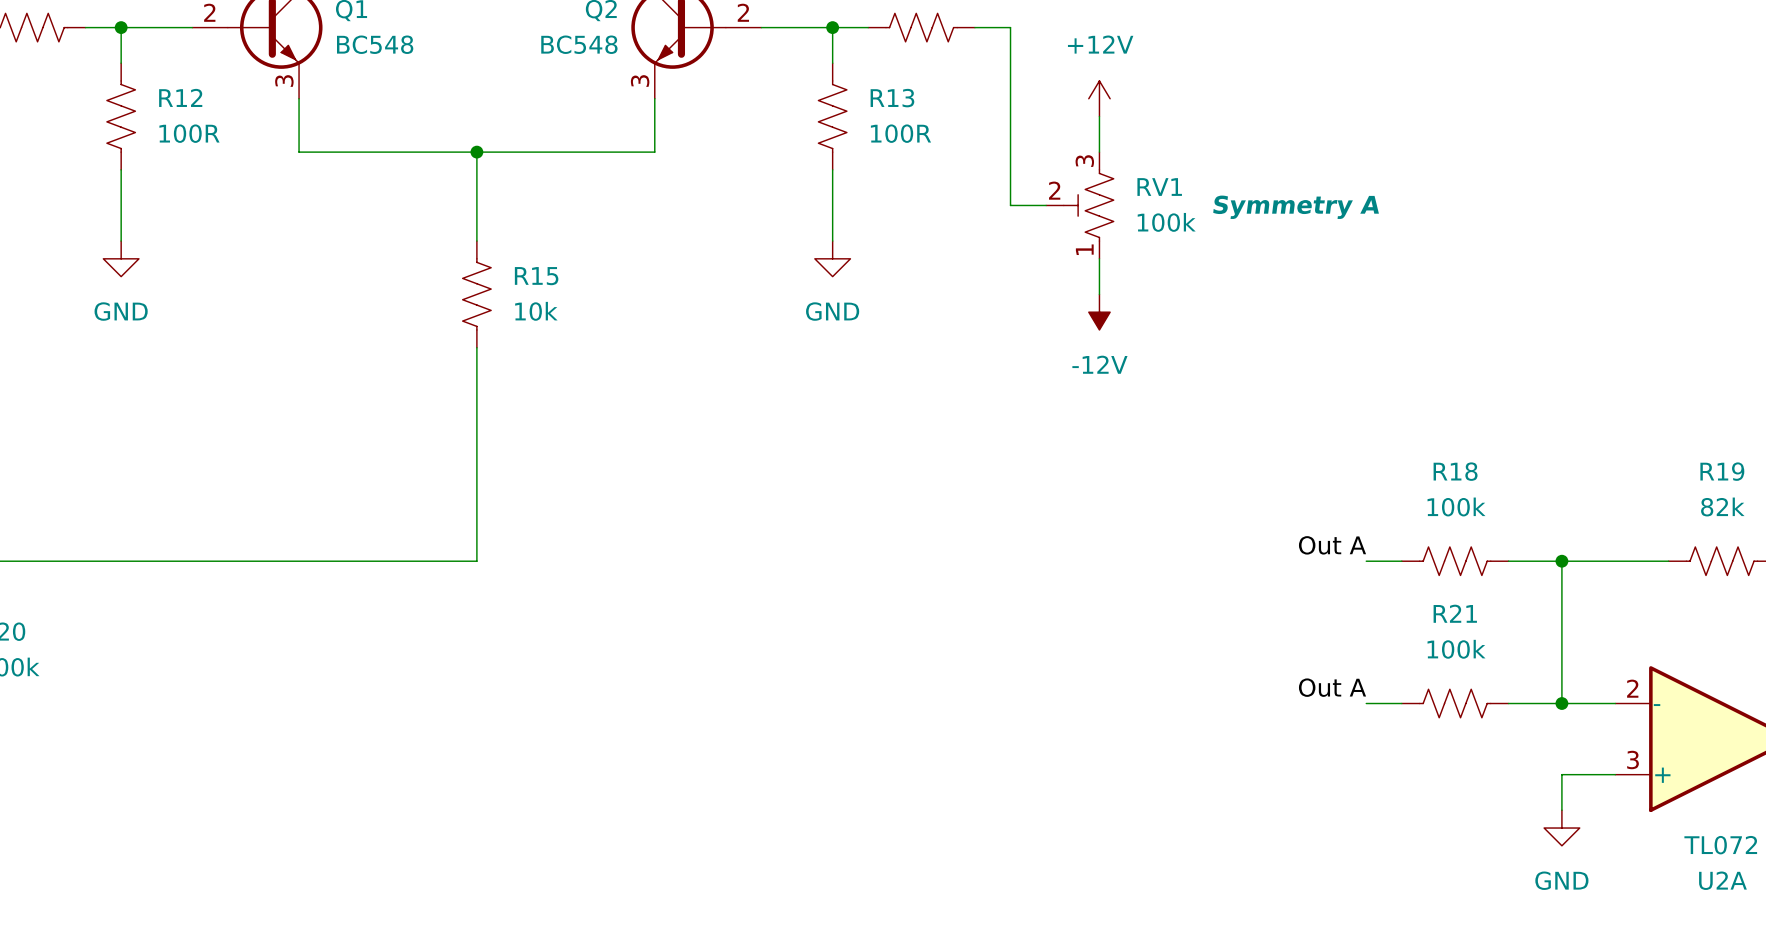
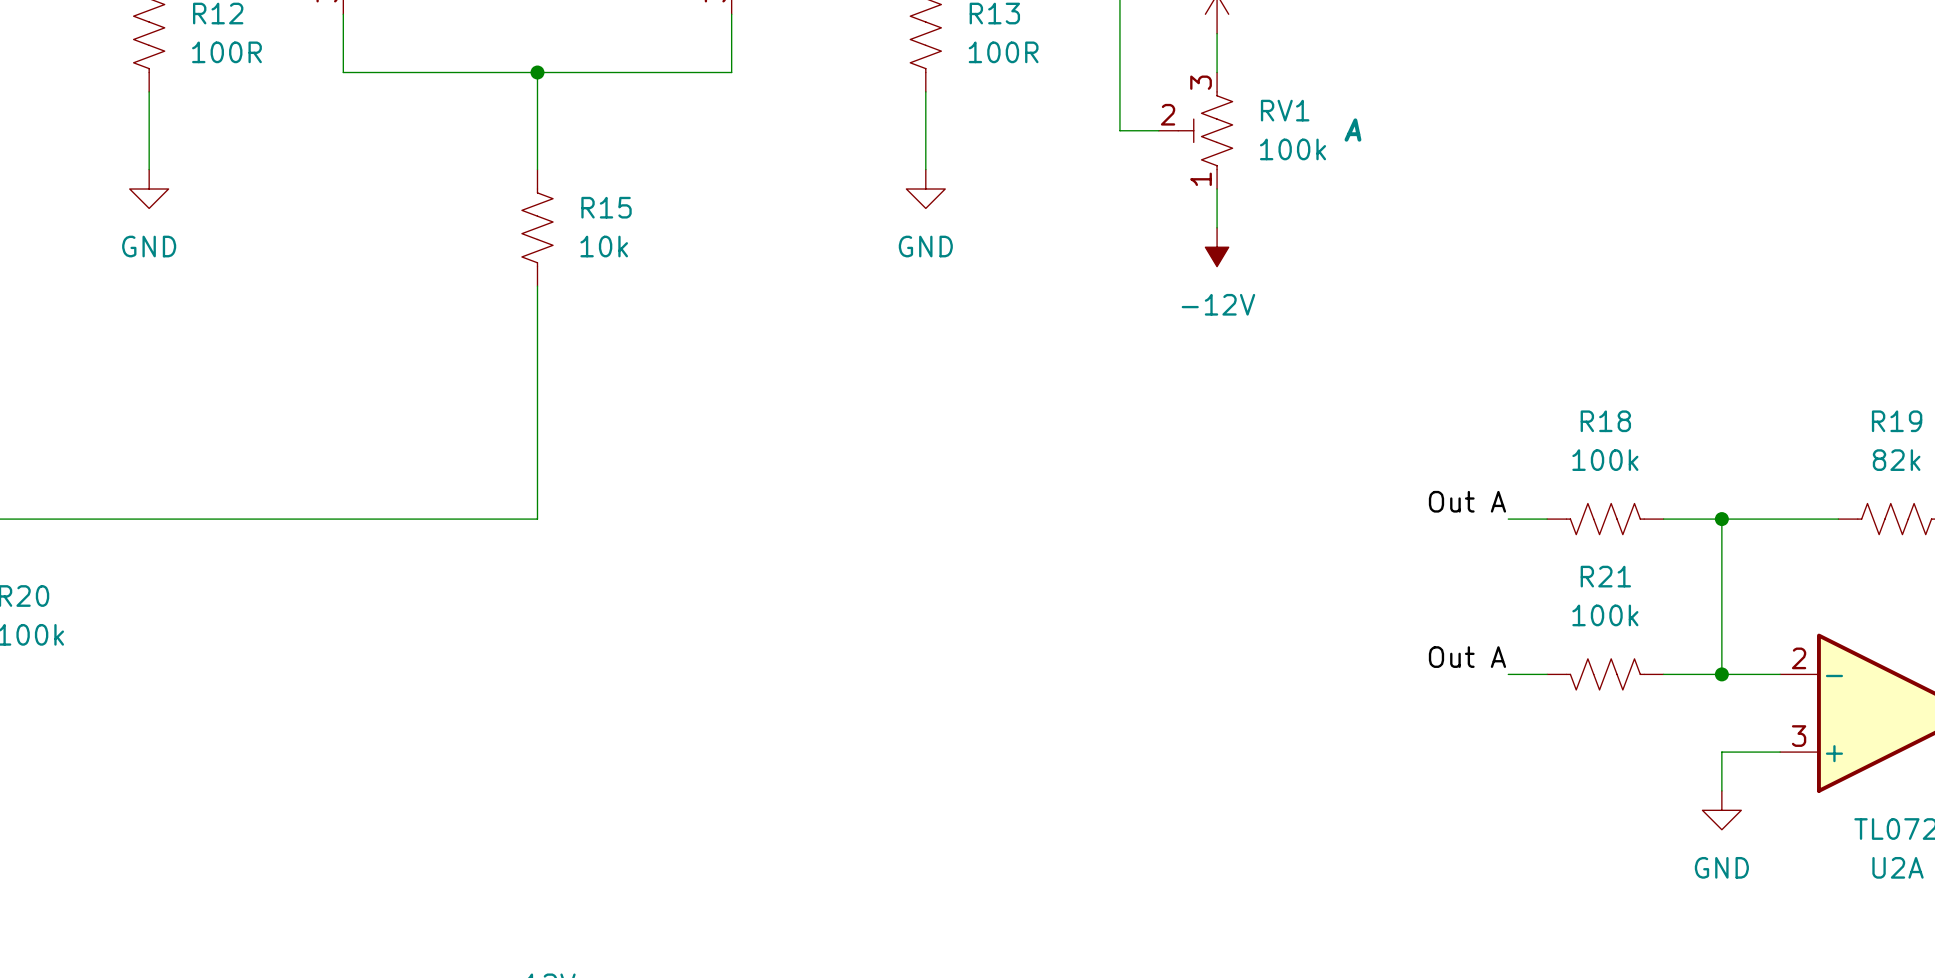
RV1 text: Symmetry A (1296, 207) -> A (1352, 130)
R18 flip: as is (1455, 561) -> left-right (1605, 519)
R21 flip: as is (1455, 703) -> left-right (1605, 674)

